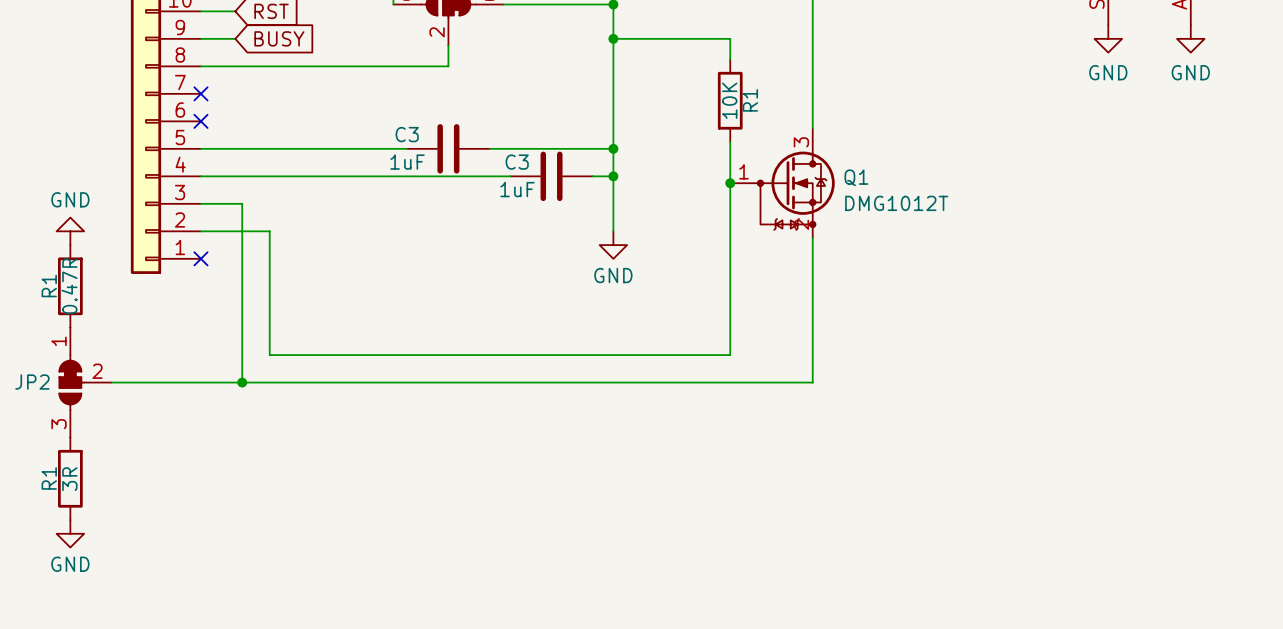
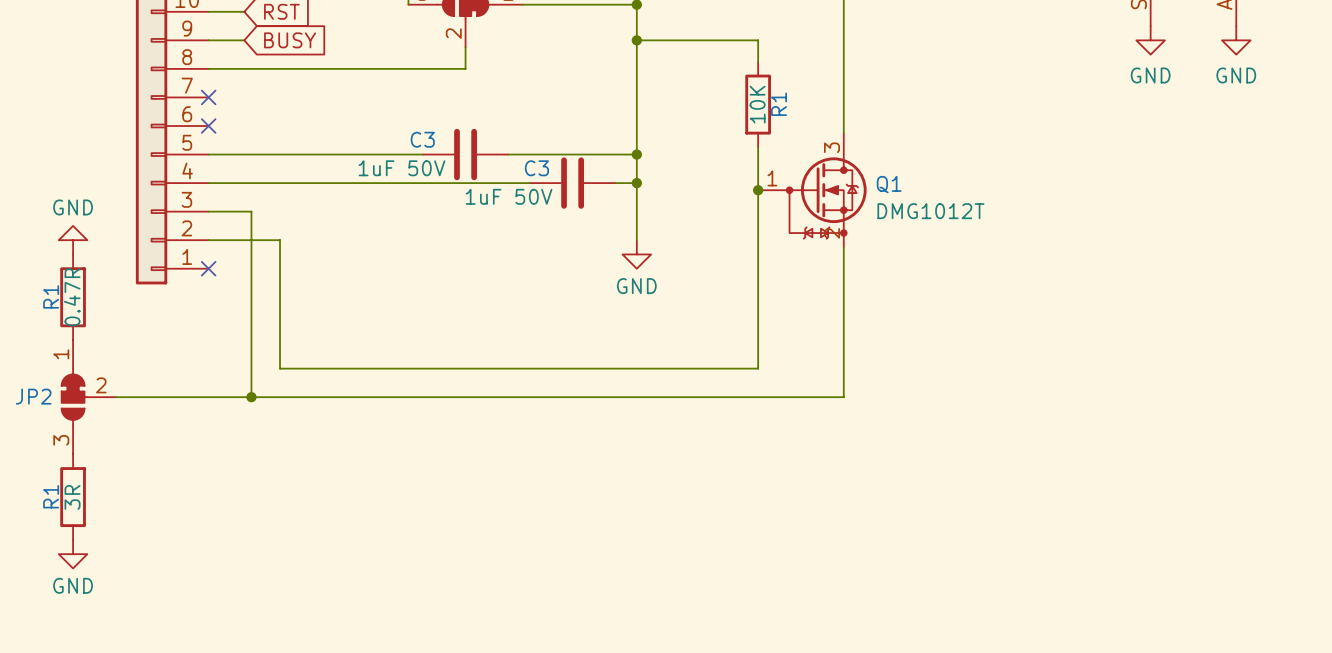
C3 value: 1uF (407, 162) -> 1uF 50V (402, 168)
C3 value: 1uF (517, 189) -> 1uF 50V (509, 196)

